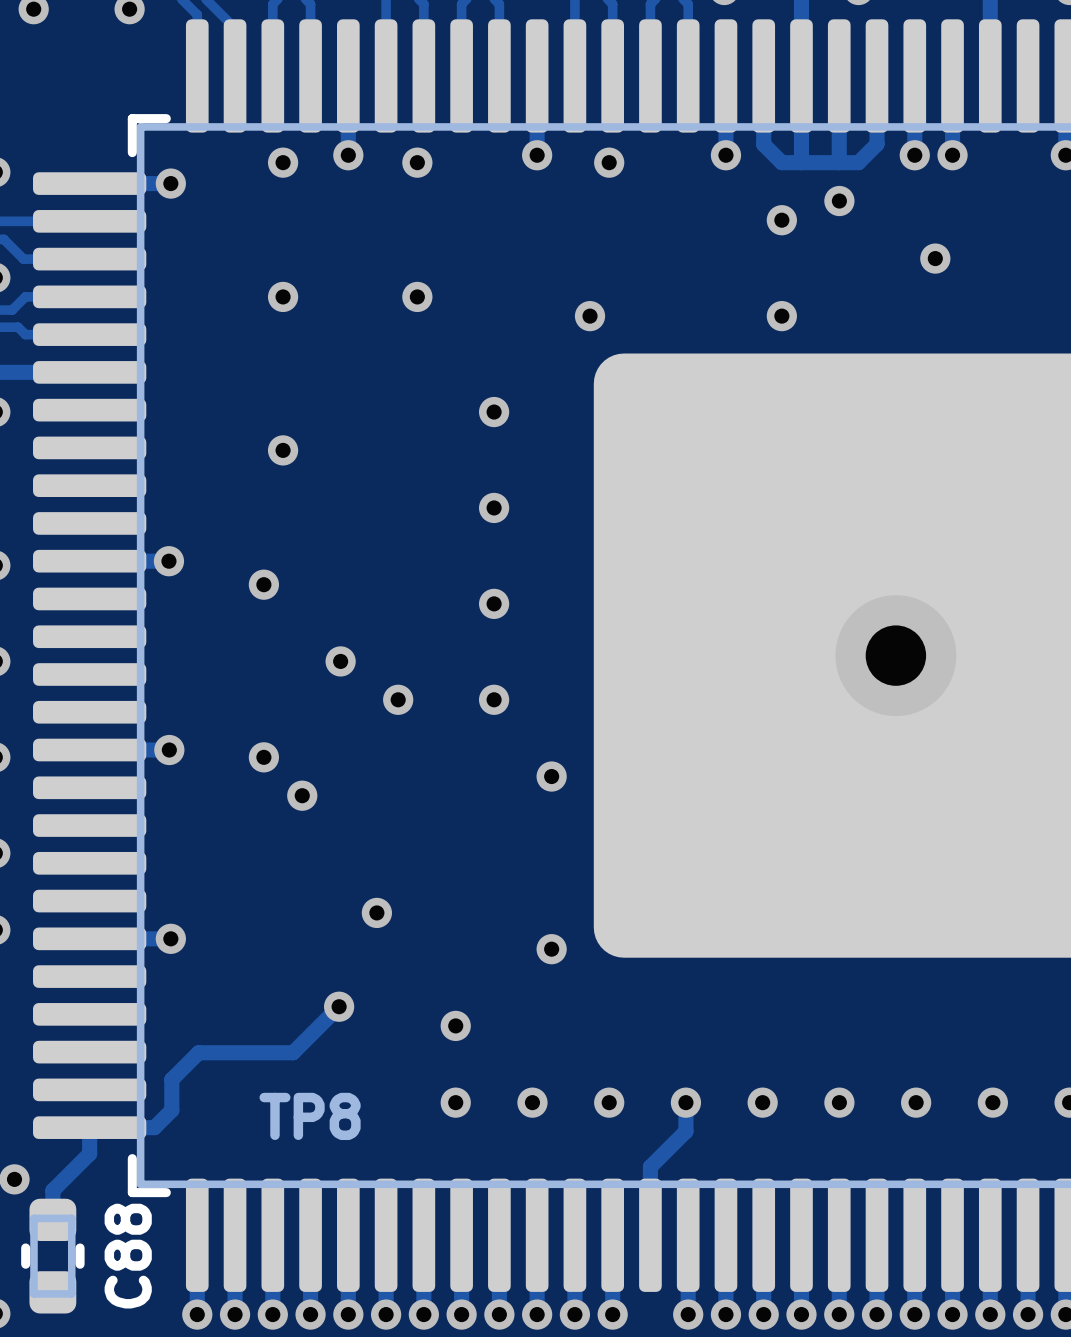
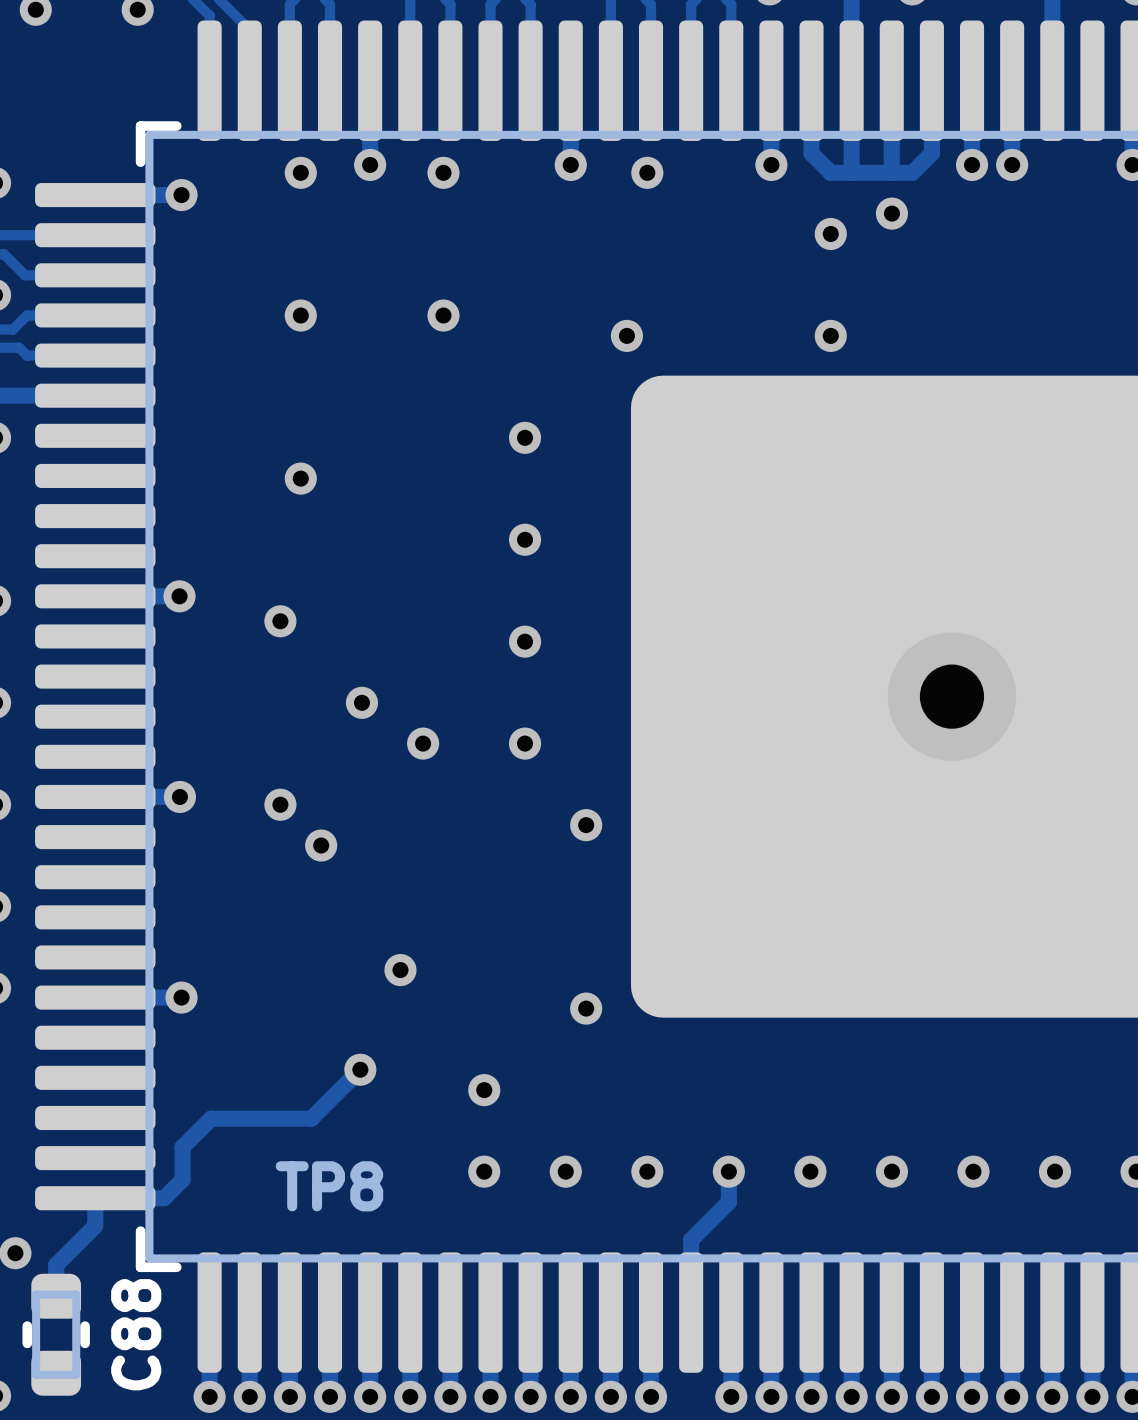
via: (935, 258) -> none

